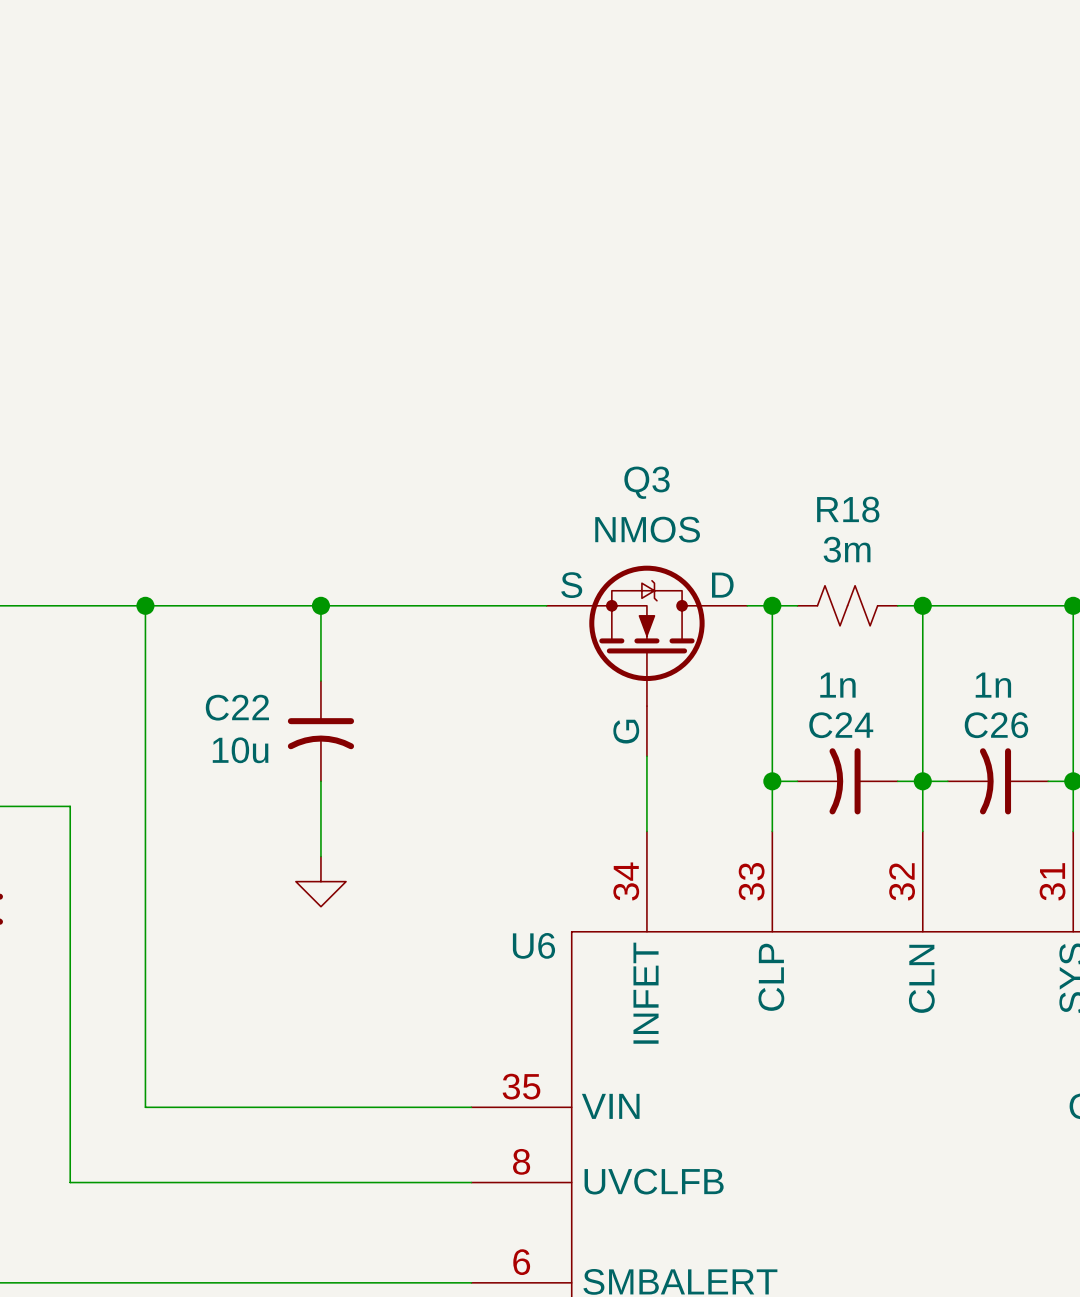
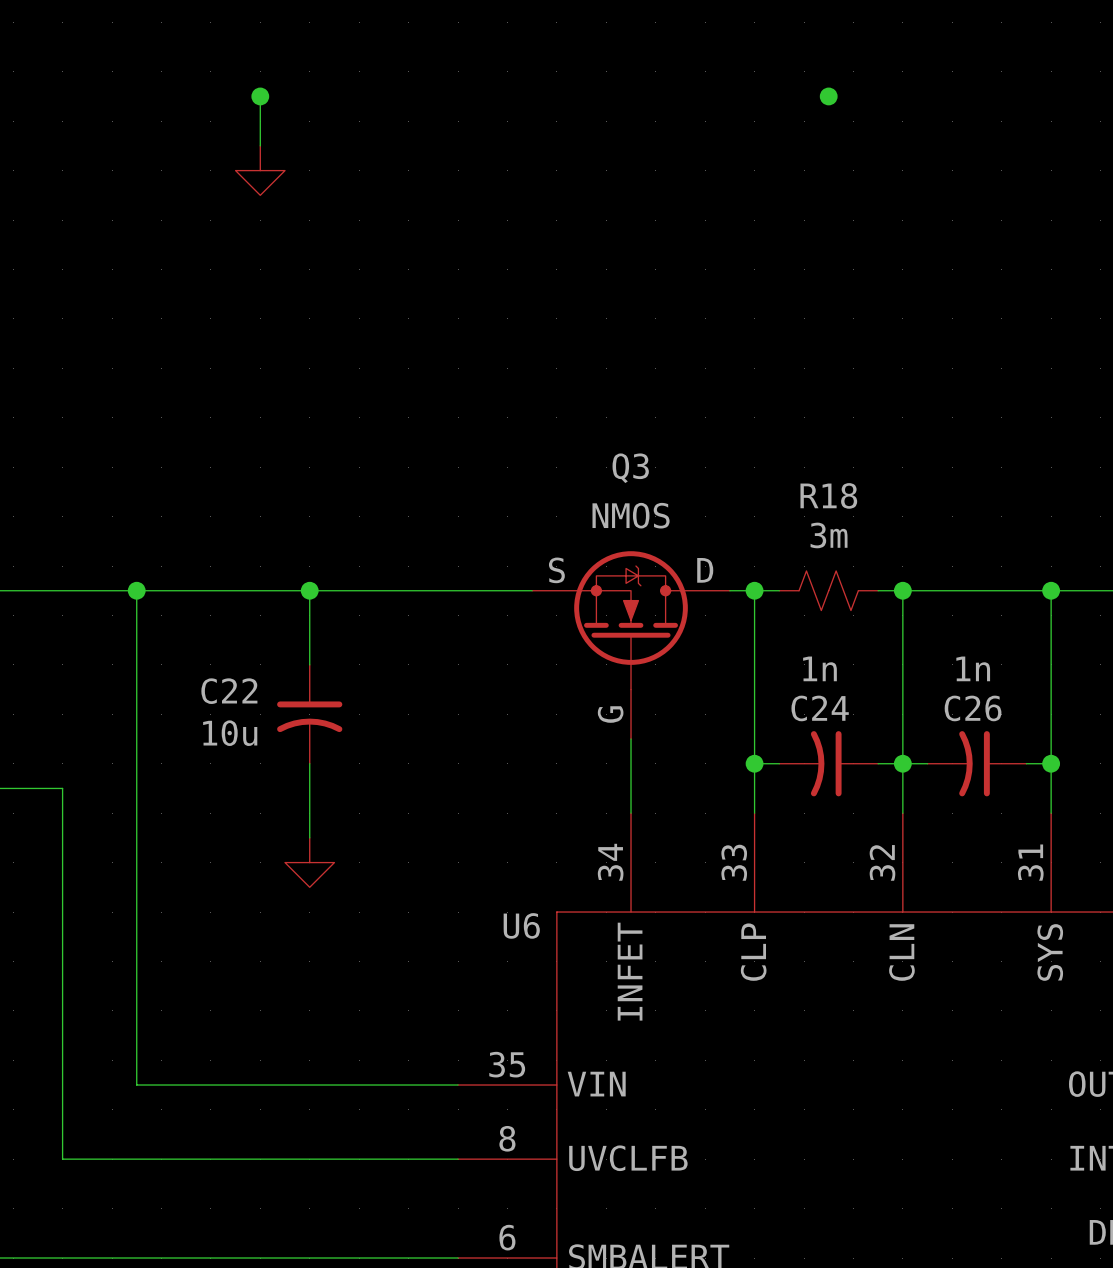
wire: none -> (260, 96) (260, 145)
junction: none -> (260, 96)
junction: none -> (828, 96)
power symbol: none -> (260, 170)

